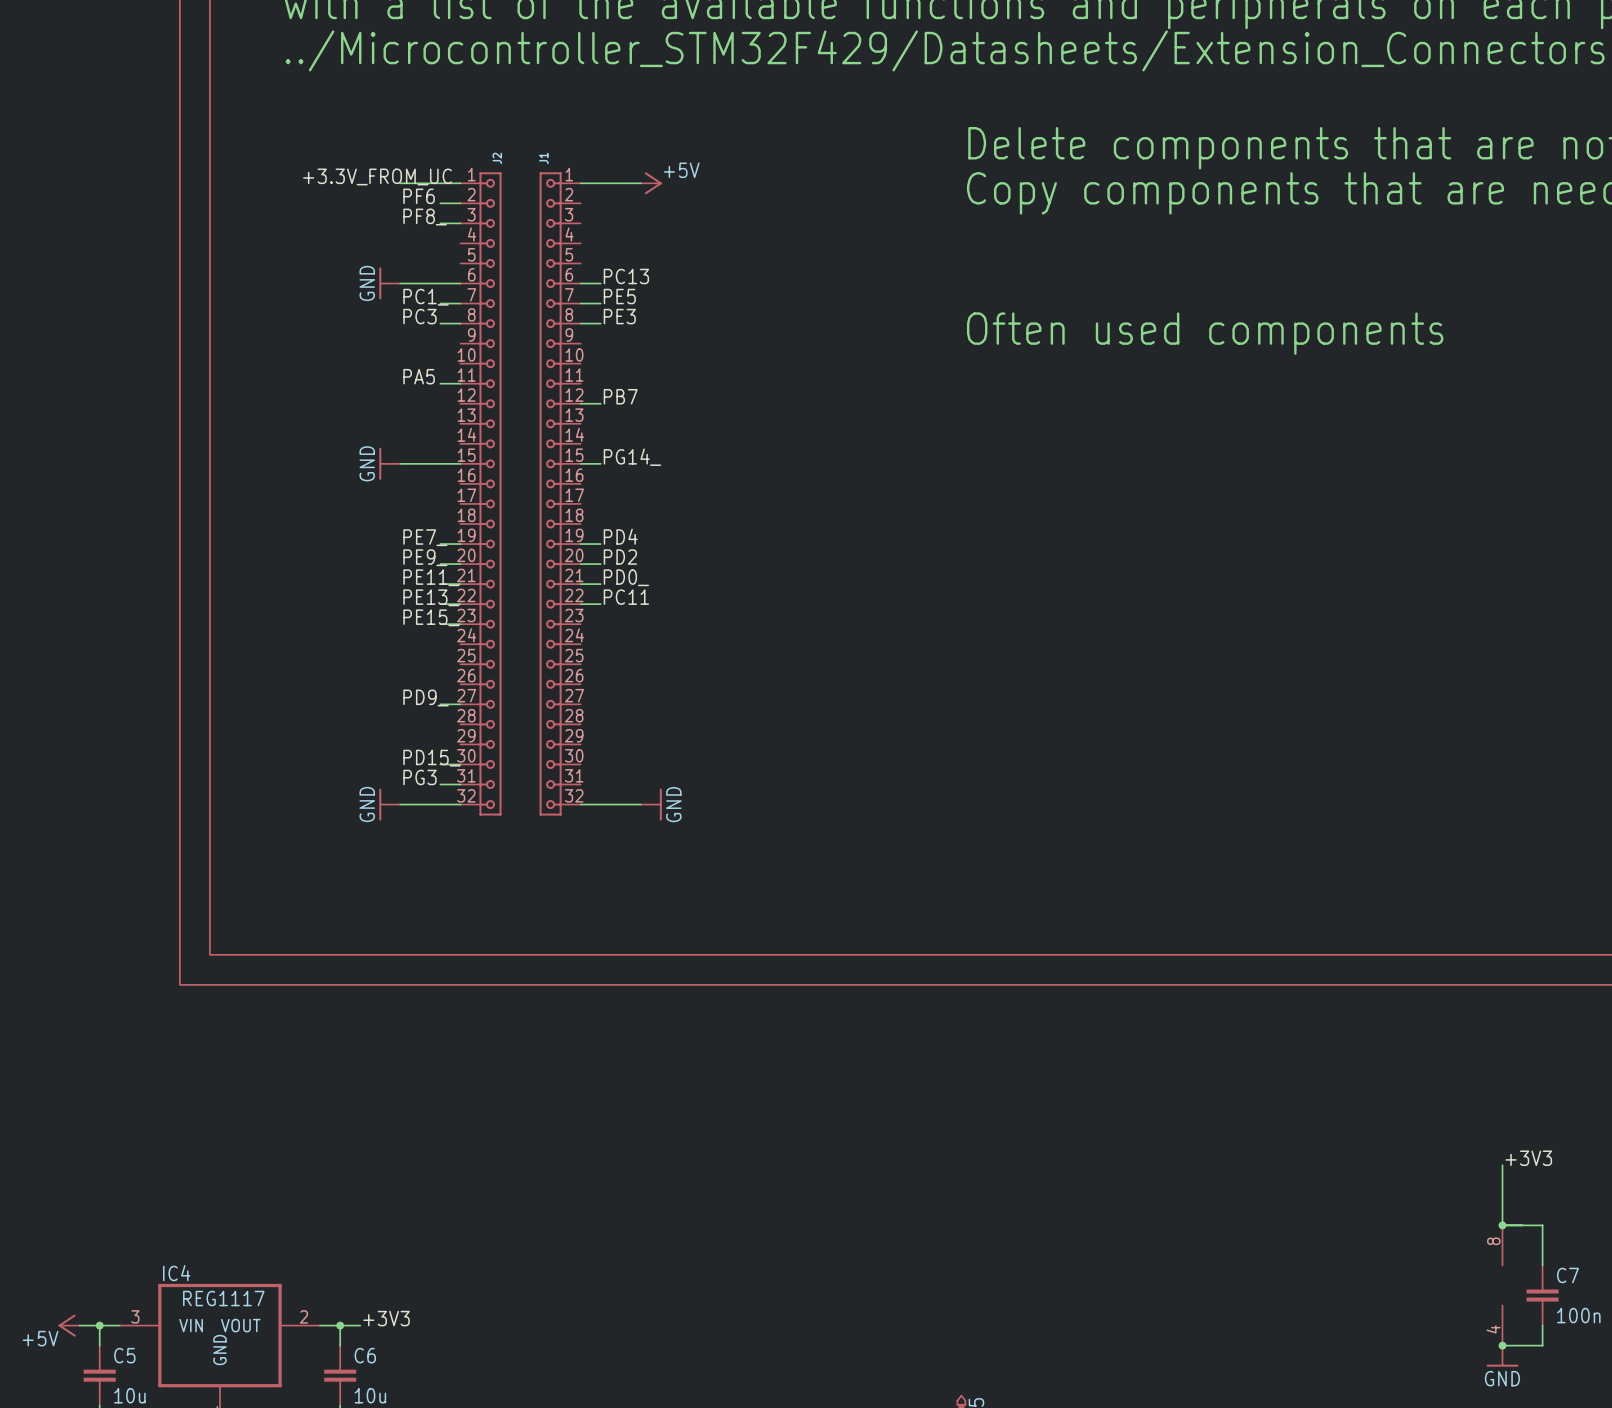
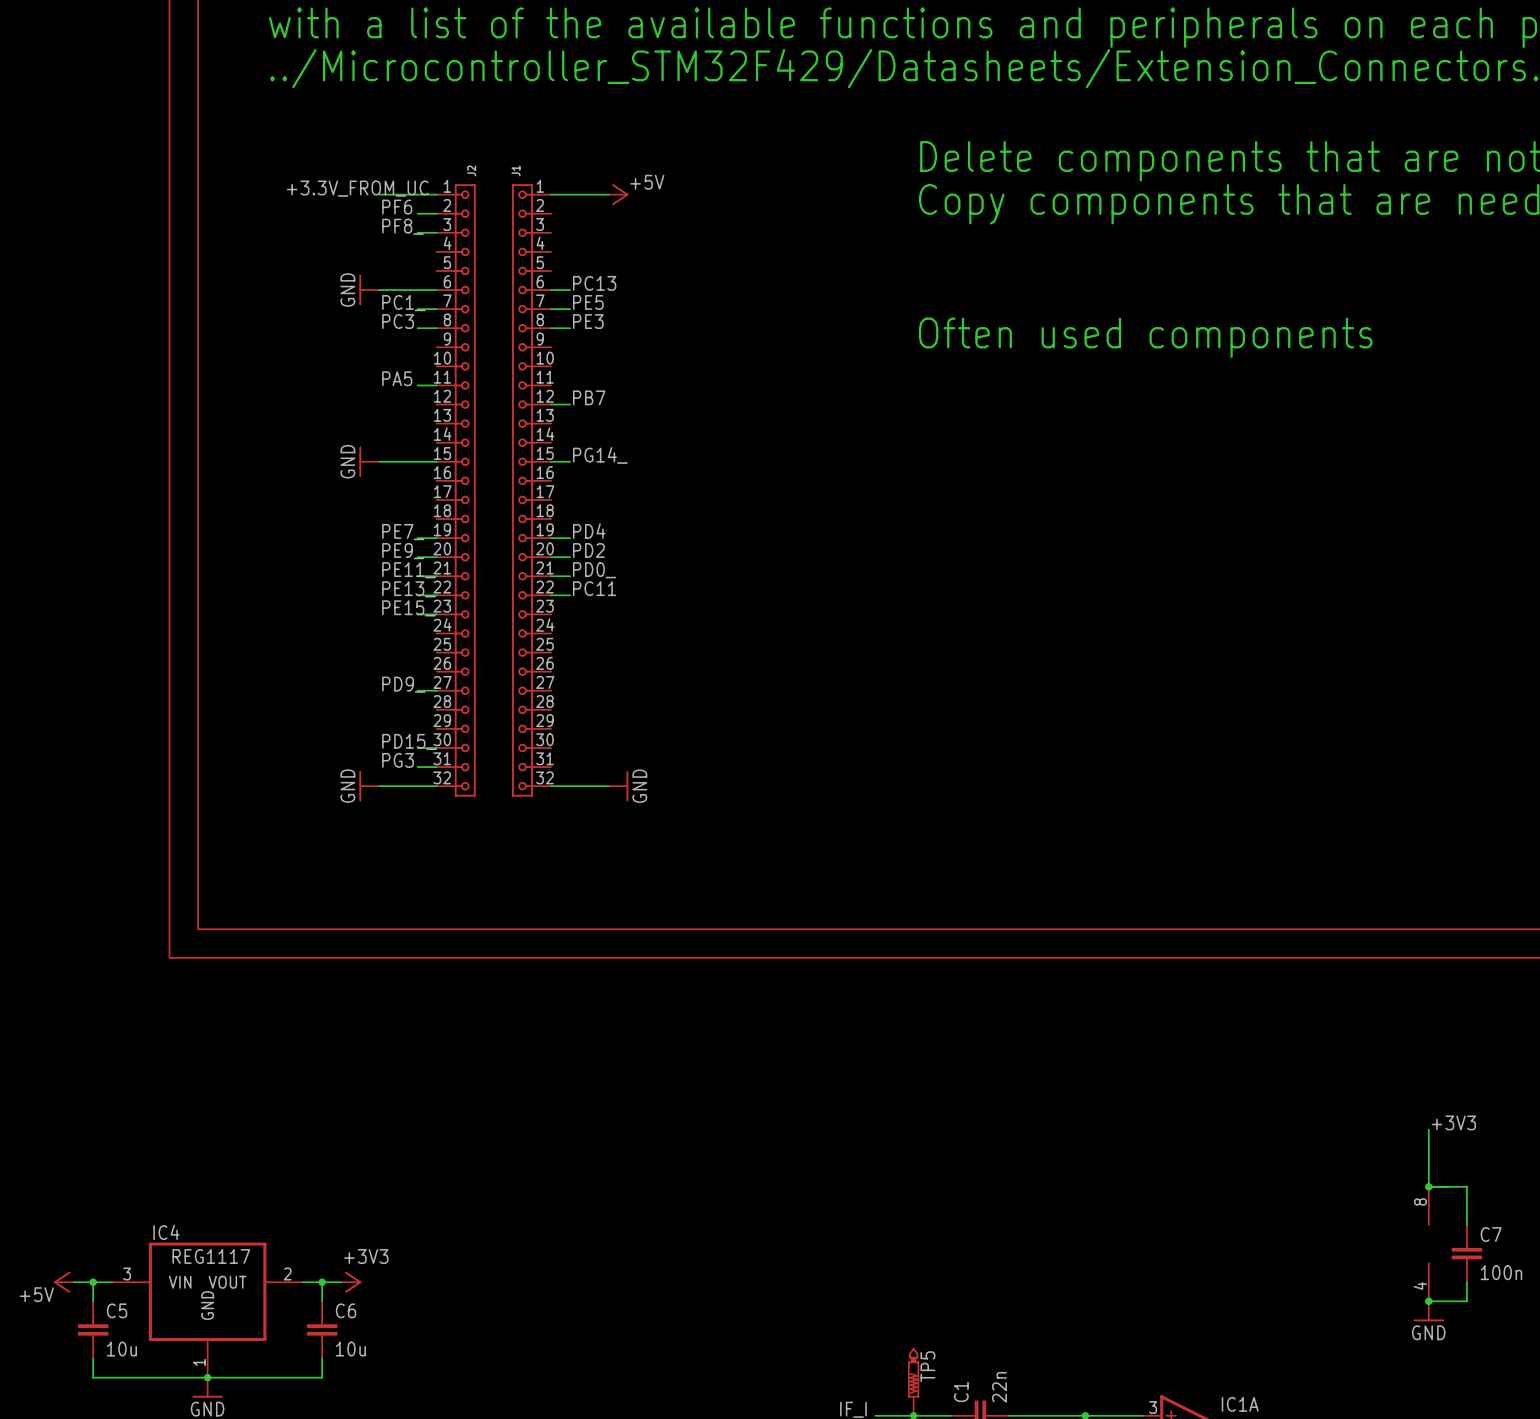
label: +3V3 (386, 1318) -> none
power symbol: none -> +3V3 (351, 1282)

